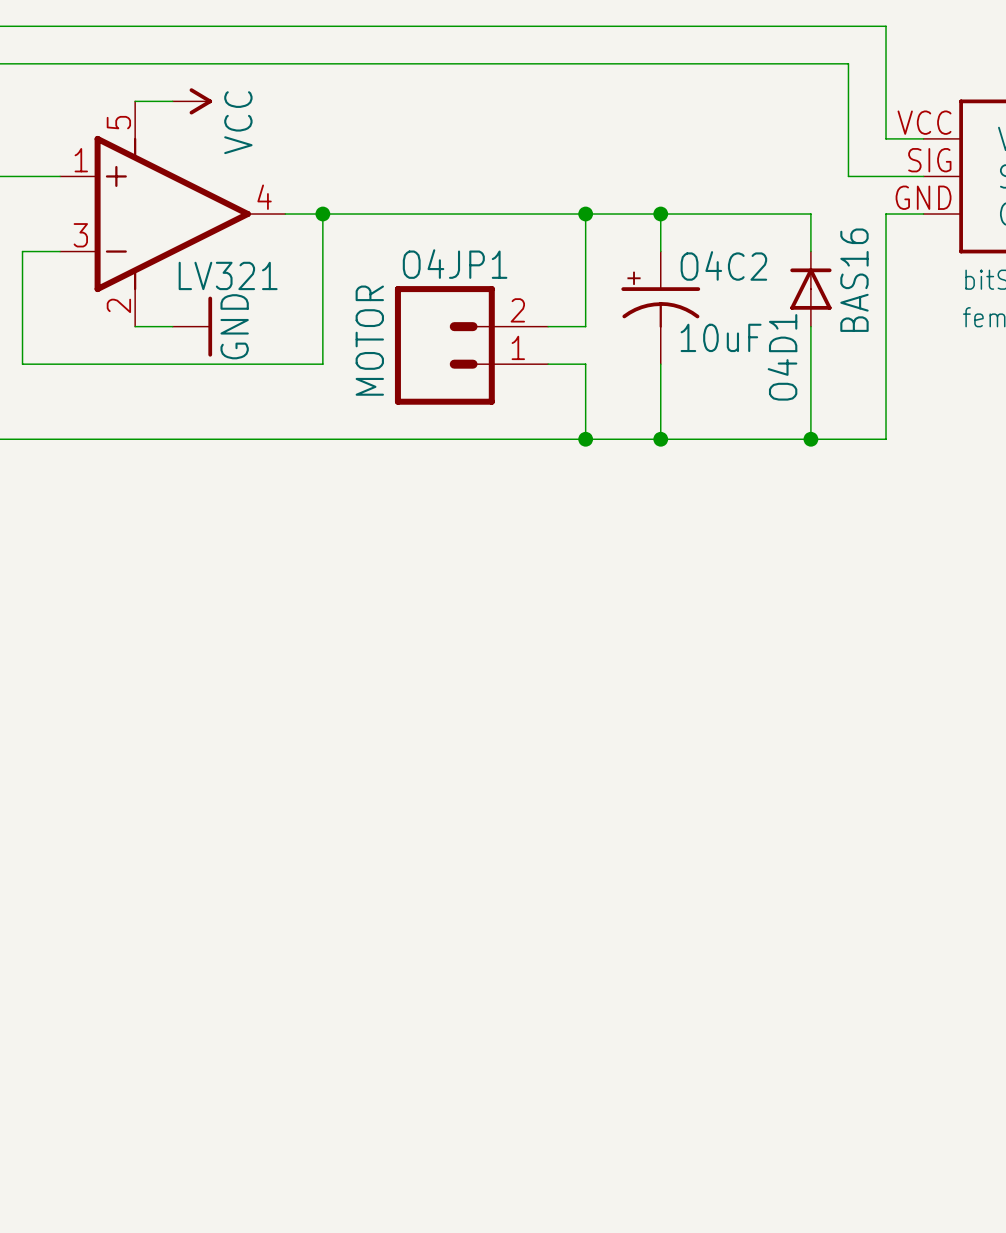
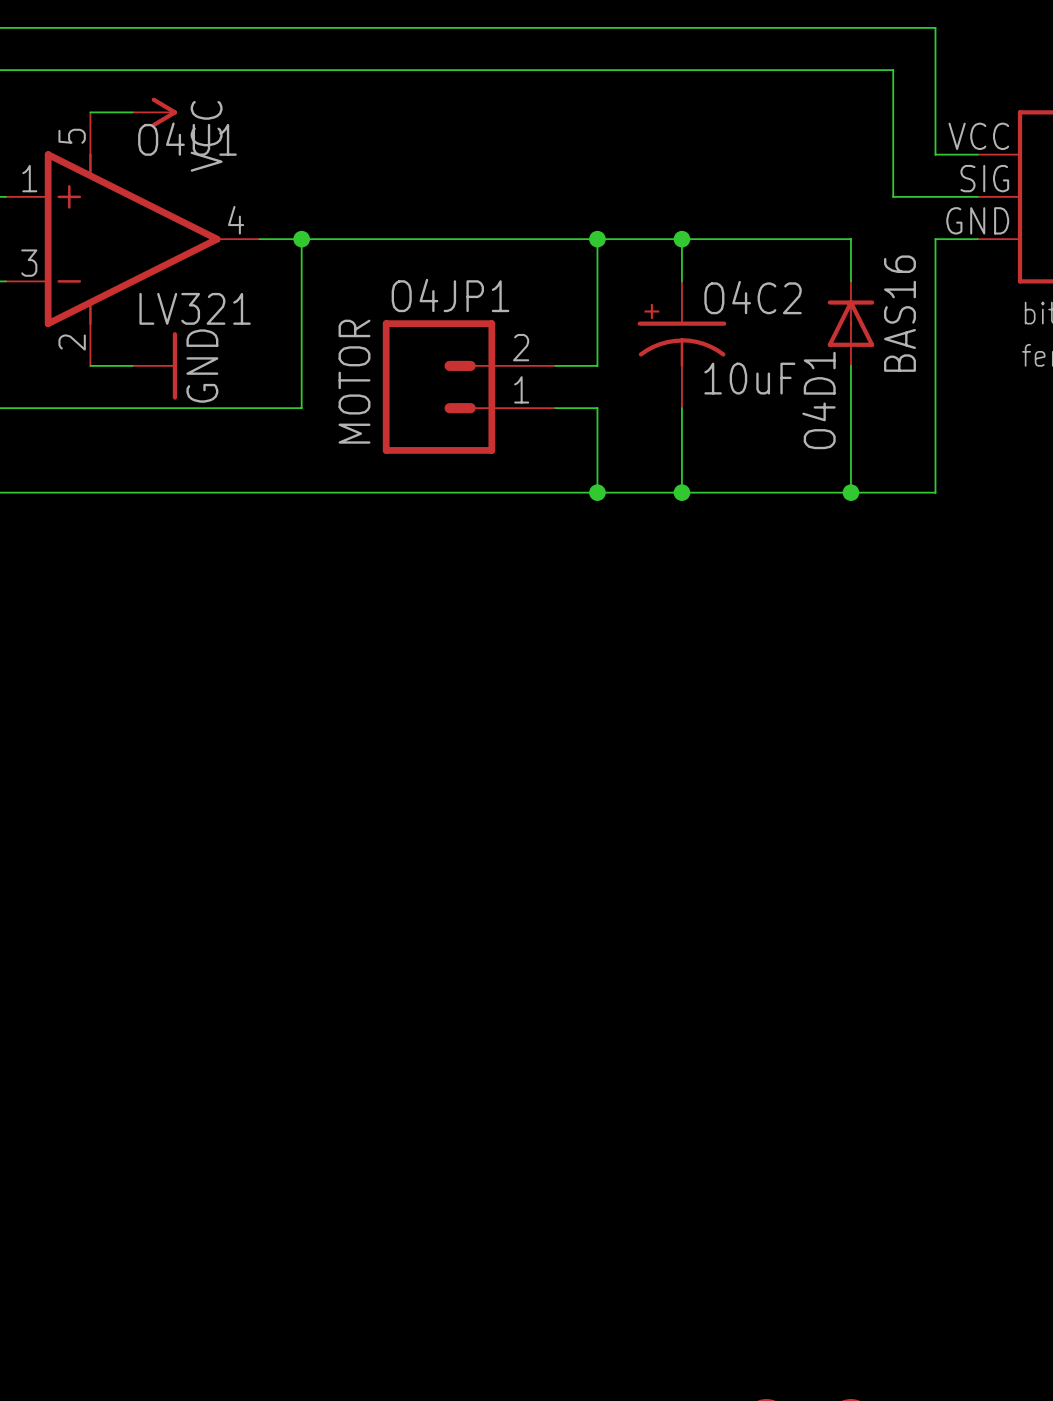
O4U1 name: none -> O4U1 (187, 139)

